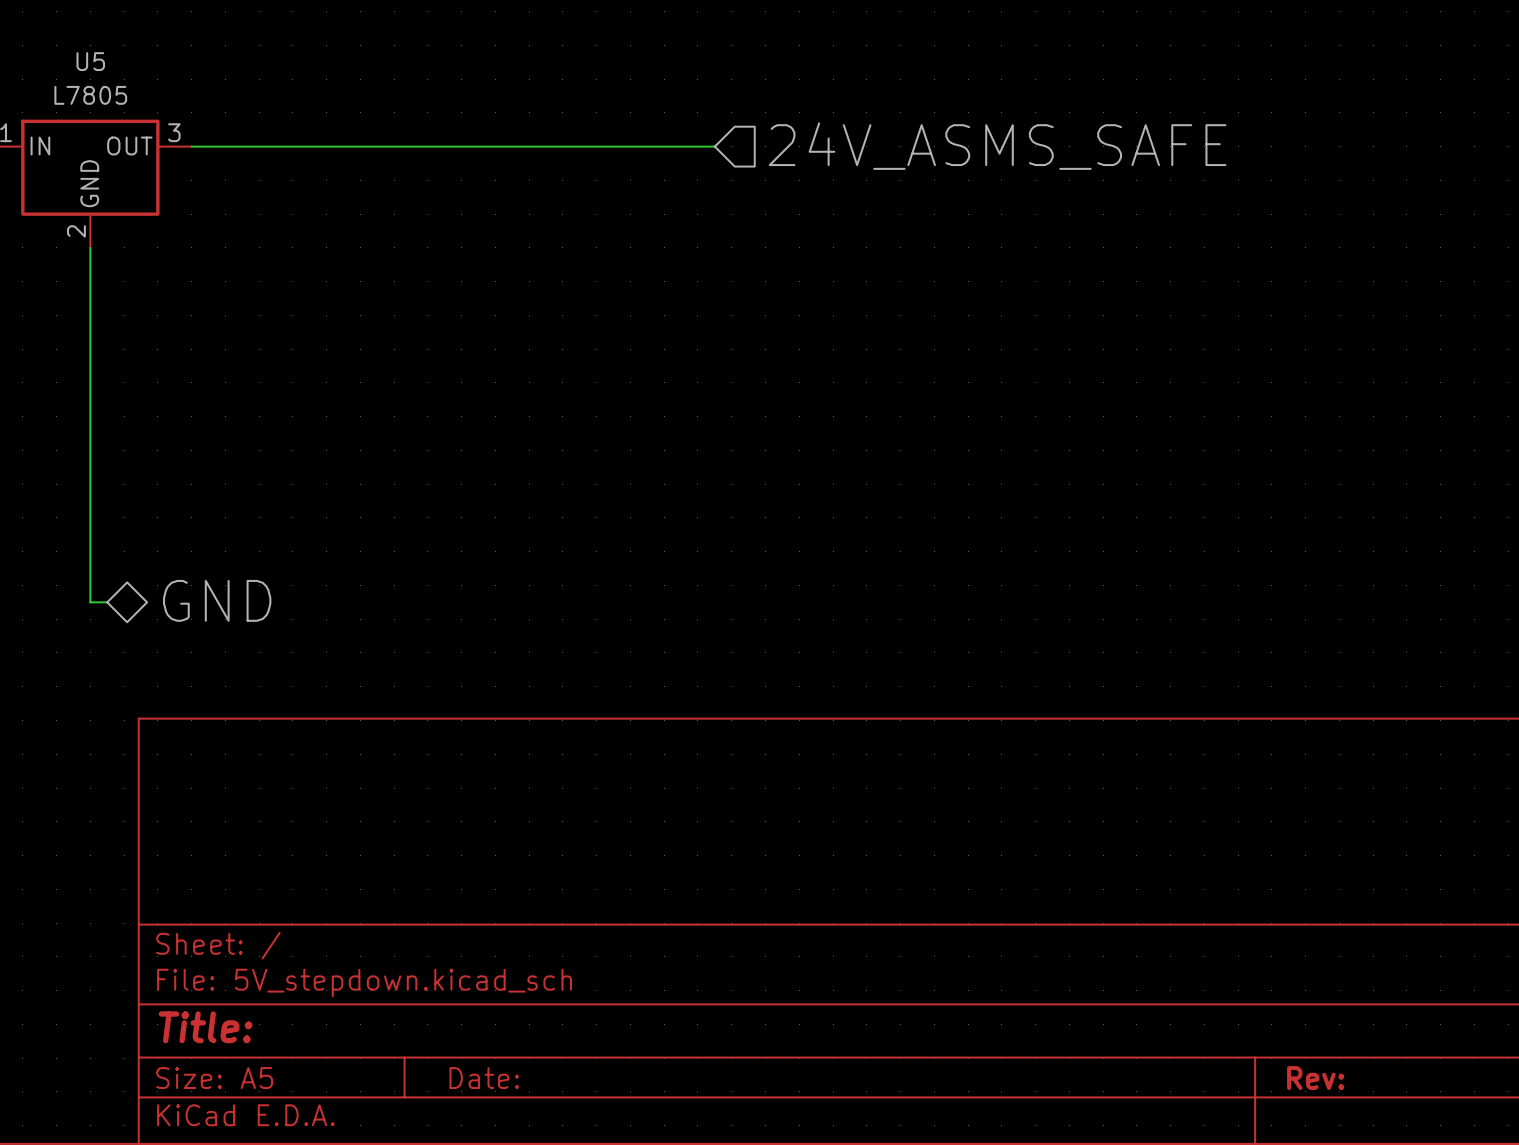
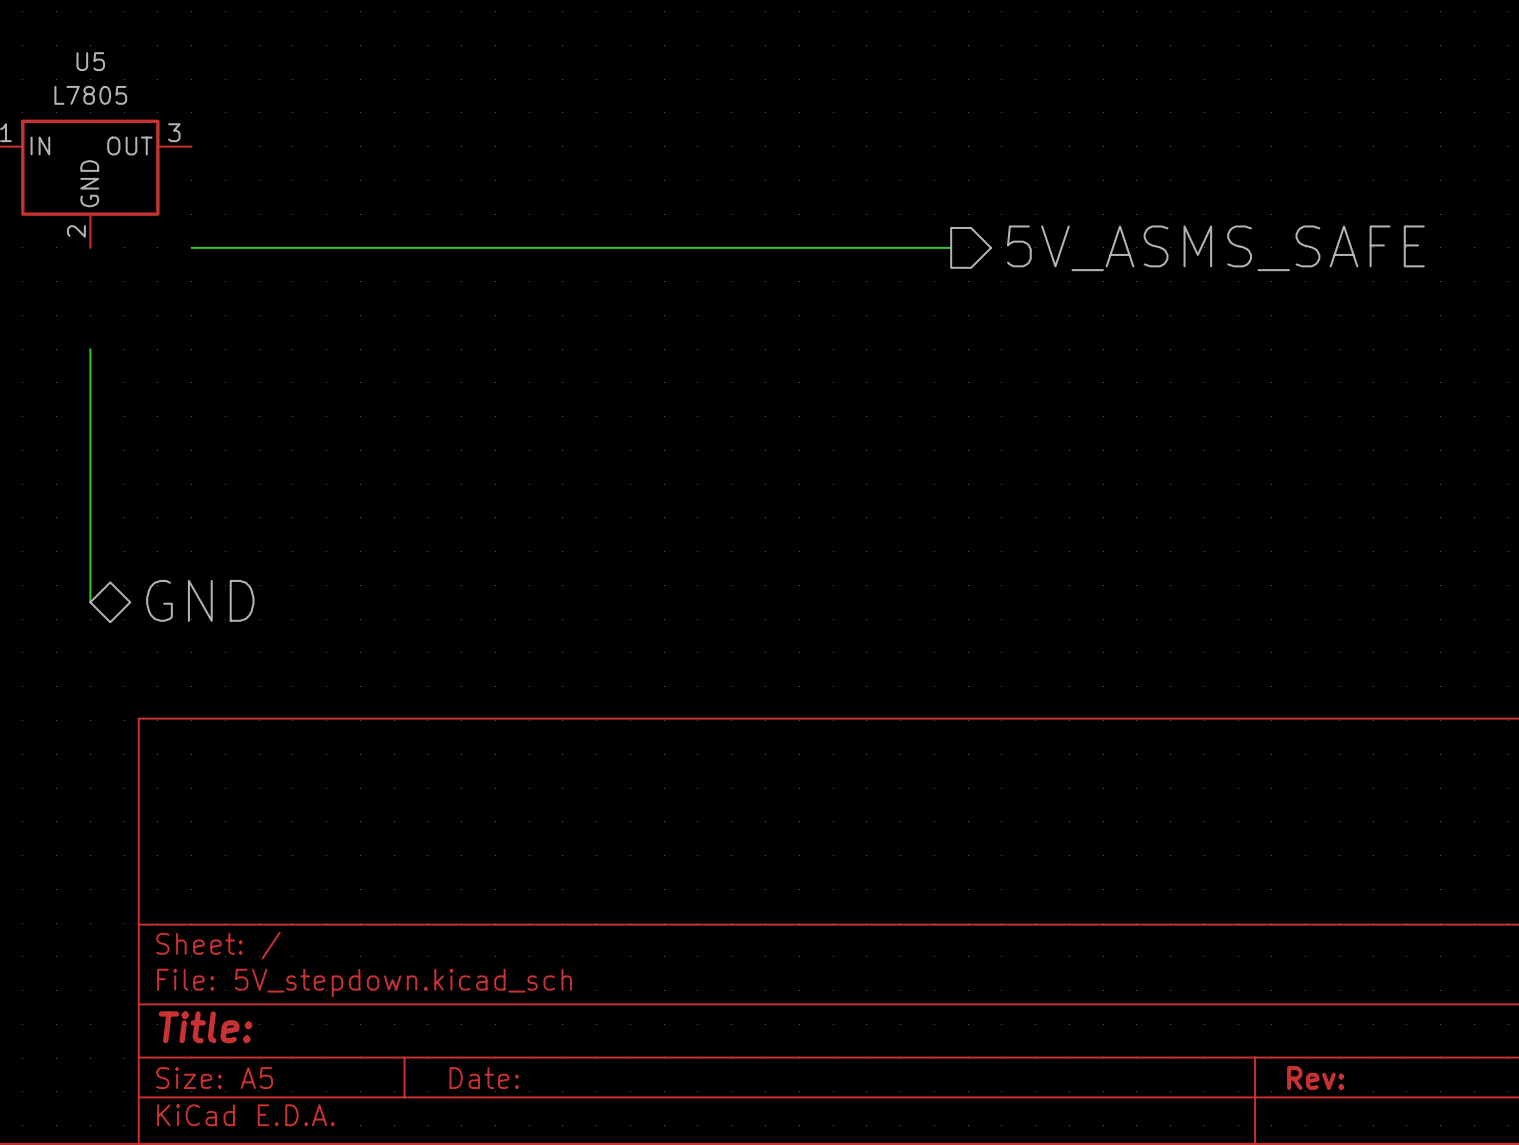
wire: (191, 146) (714, 146) -> none
hierarchical label: 24V_ASMS_SAFE (997, 146) -> none
wire: (90, 247) (90, 349) -> none
wire: none -> (191, 247) (951, 247)
hierarchical label: none -> 5V_ASMS_SAFE (1215, 248)
hierarchical label position: GND (217, 600) -> GND (200, 600)
wire: (90, 602) (107, 602) -> none

